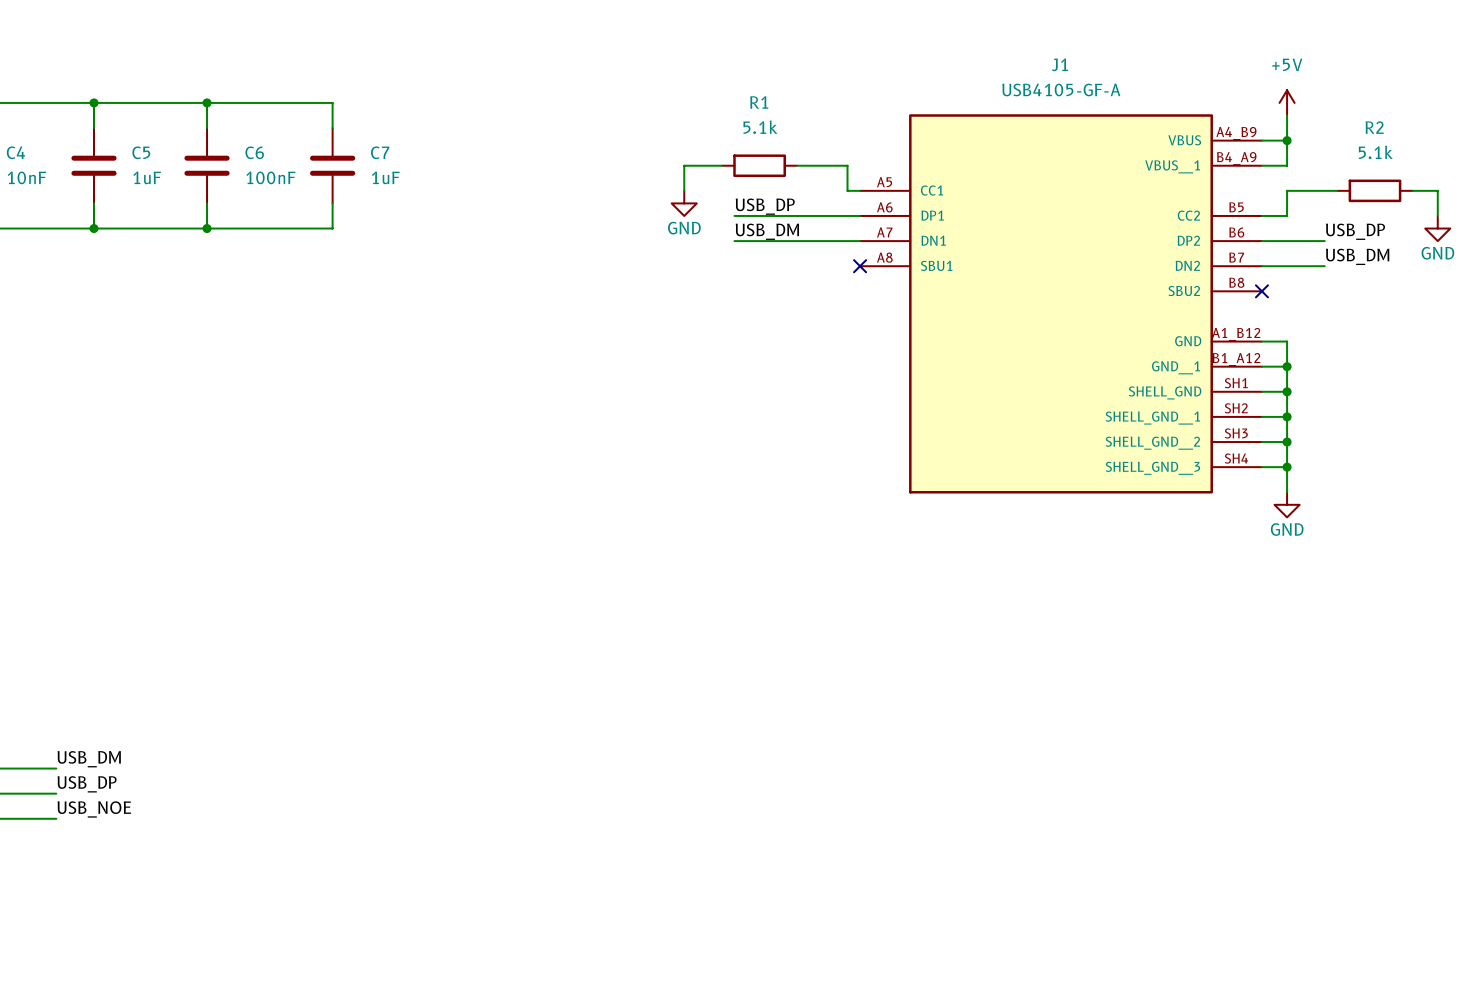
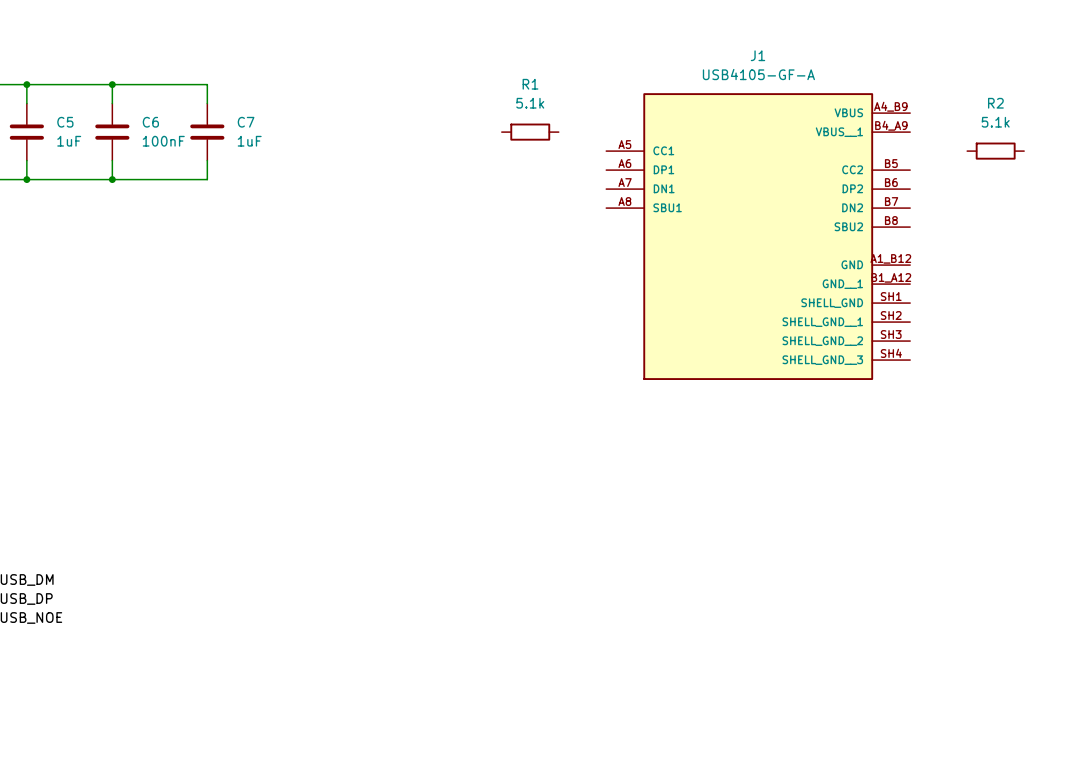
power symbol: +5V (1287, 102) -> none
wire: (1287, 115) (1287, 165) (1261, 165) -> none
wire: (1261, 140) (1287, 140) -> none
junction: (1287, 140) -> none
wire: (721, 165) (684, 165) (684, 190) -> none
wire: (797, 165) (847, 165) (847, 190) (860, 190) -> none
wire: (1337, 190) (1287, 190) (1287, 215) (1261, 215) -> none
wire: (1412, 190) (1437, 190) (1437, 215) -> none
power symbol: GND (684, 203) -> none
label: USB_DP (765, 206) -> none
wire: (734, 215) (860, 215) -> none
power symbol: GND (1437, 228) -> none
label: USB_DM (767, 231) -> none
label: USB_DP (1355, 231) -> none
wire: (734, 241) (860, 241) -> none
wire: (1261, 241) (1324, 241) -> none
label: USB_DM (1357, 256) -> none
no-connect mark: (860, 266) -> none
wire: (1261, 266) (1324, 266) -> none
no-connect mark: (1261, 291) -> none
wire: (1261, 341) (1287, 341) (1287, 492) -> none
wire: (1261, 366) (1287, 366) -> none
junction: (1287, 366) -> none
wire: (1261, 391) (1287, 391) -> none
junction: (1287, 391) -> none
wire: (1261, 416) (1287, 416) -> none
junction: (1287, 416) -> none
wire: (1261, 442) (1287, 442) -> none
junction: (1287, 442) -> none
wire: (1261, 467) (1287, 467) -> none
junction: (1287, 467) -> none
power symbol: GND (1287, 504) -> none

